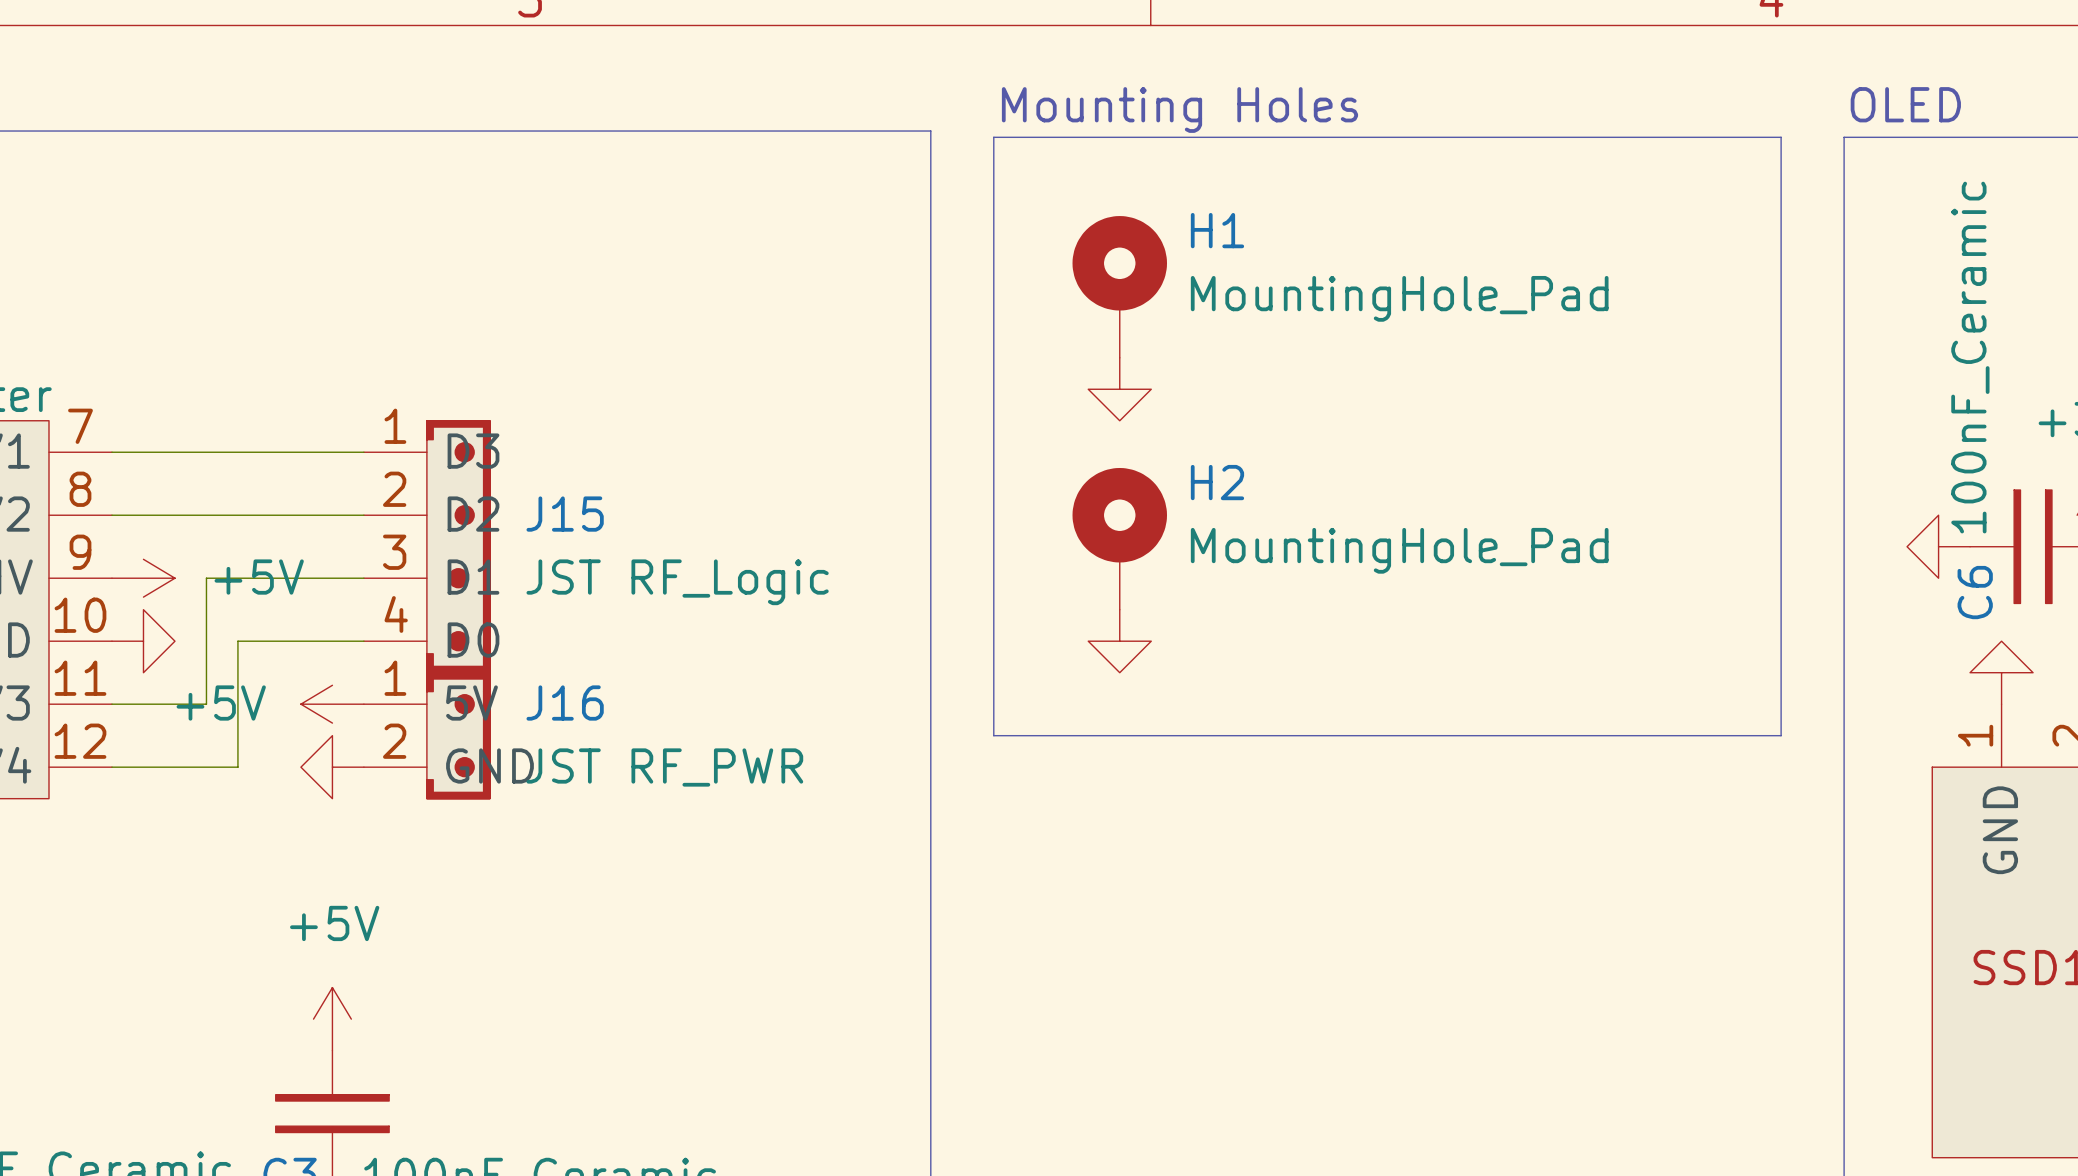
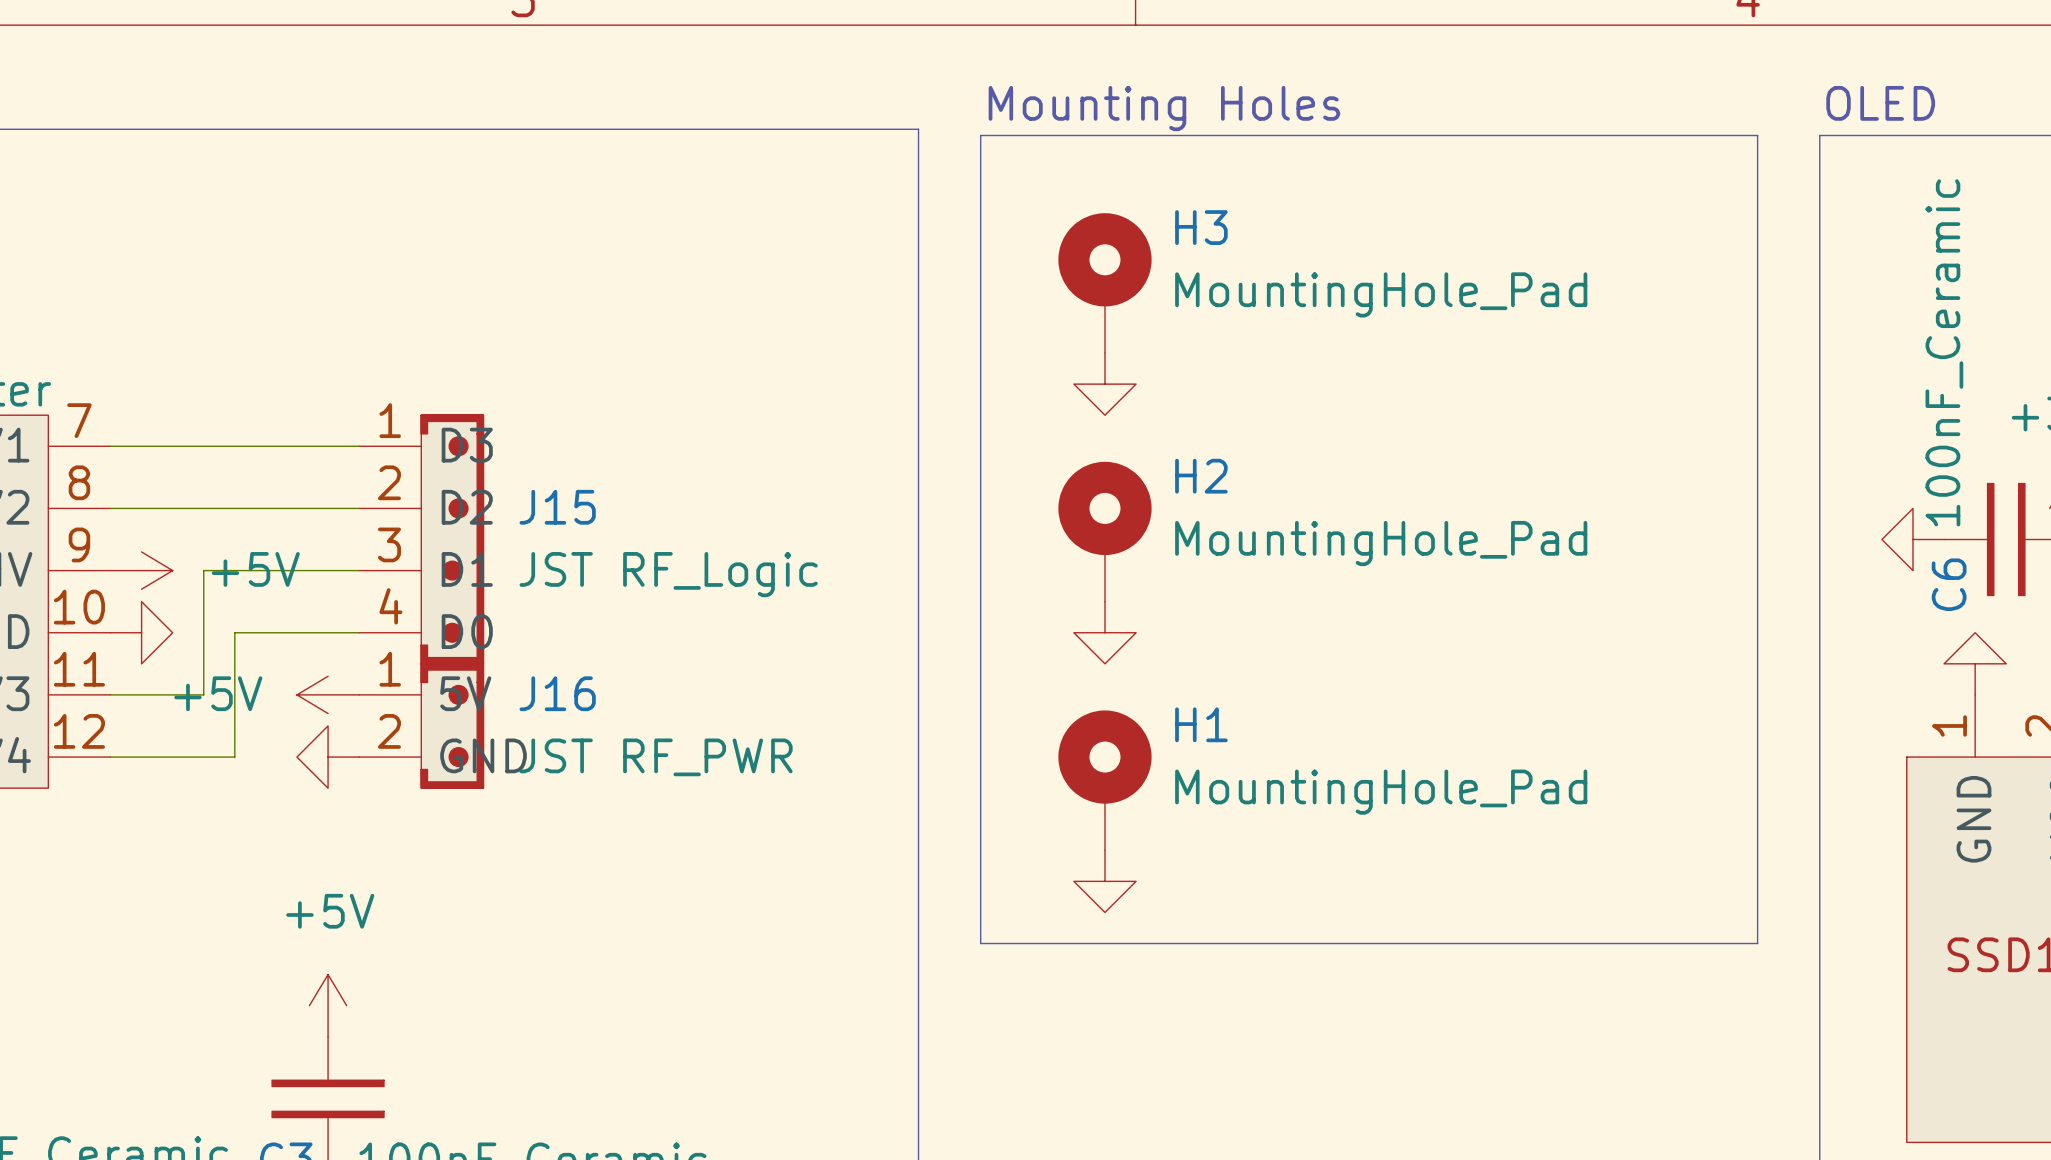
H1 name: H1 (1217, 230) -> H3 (1201, 227)
line: (993, 735) (1781, 735) -> (980, 725) (980, 943) (1757, 943) (1757, 725)
H1: none -> MountingHole_Pad (1104, 780)
power symbol: none -> (1104, 881)

